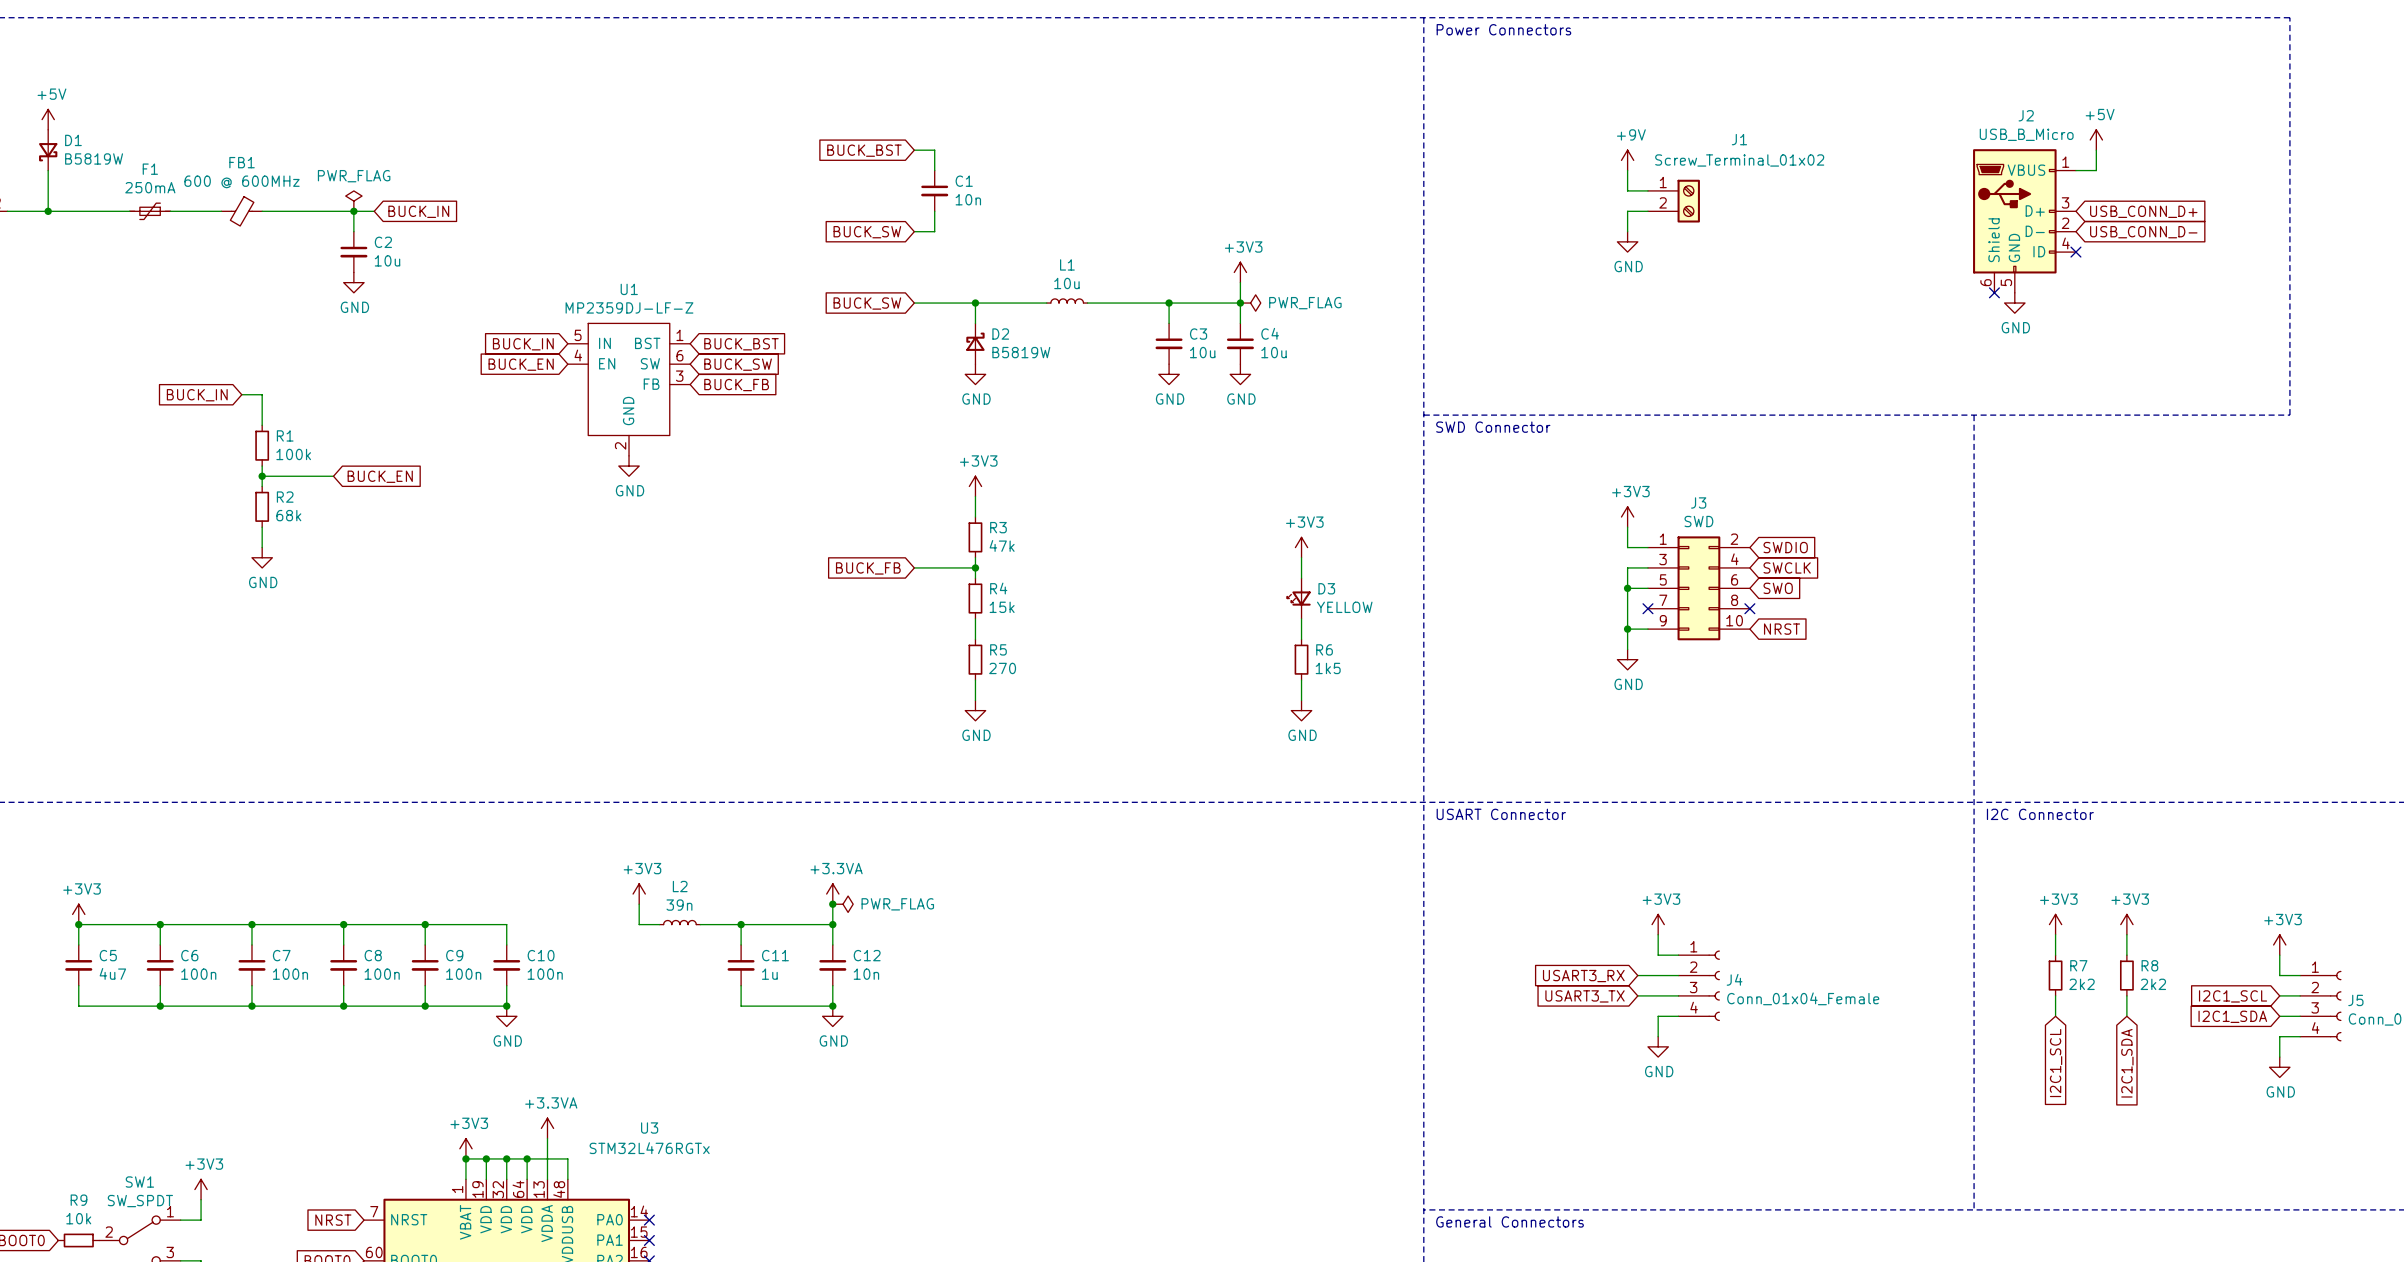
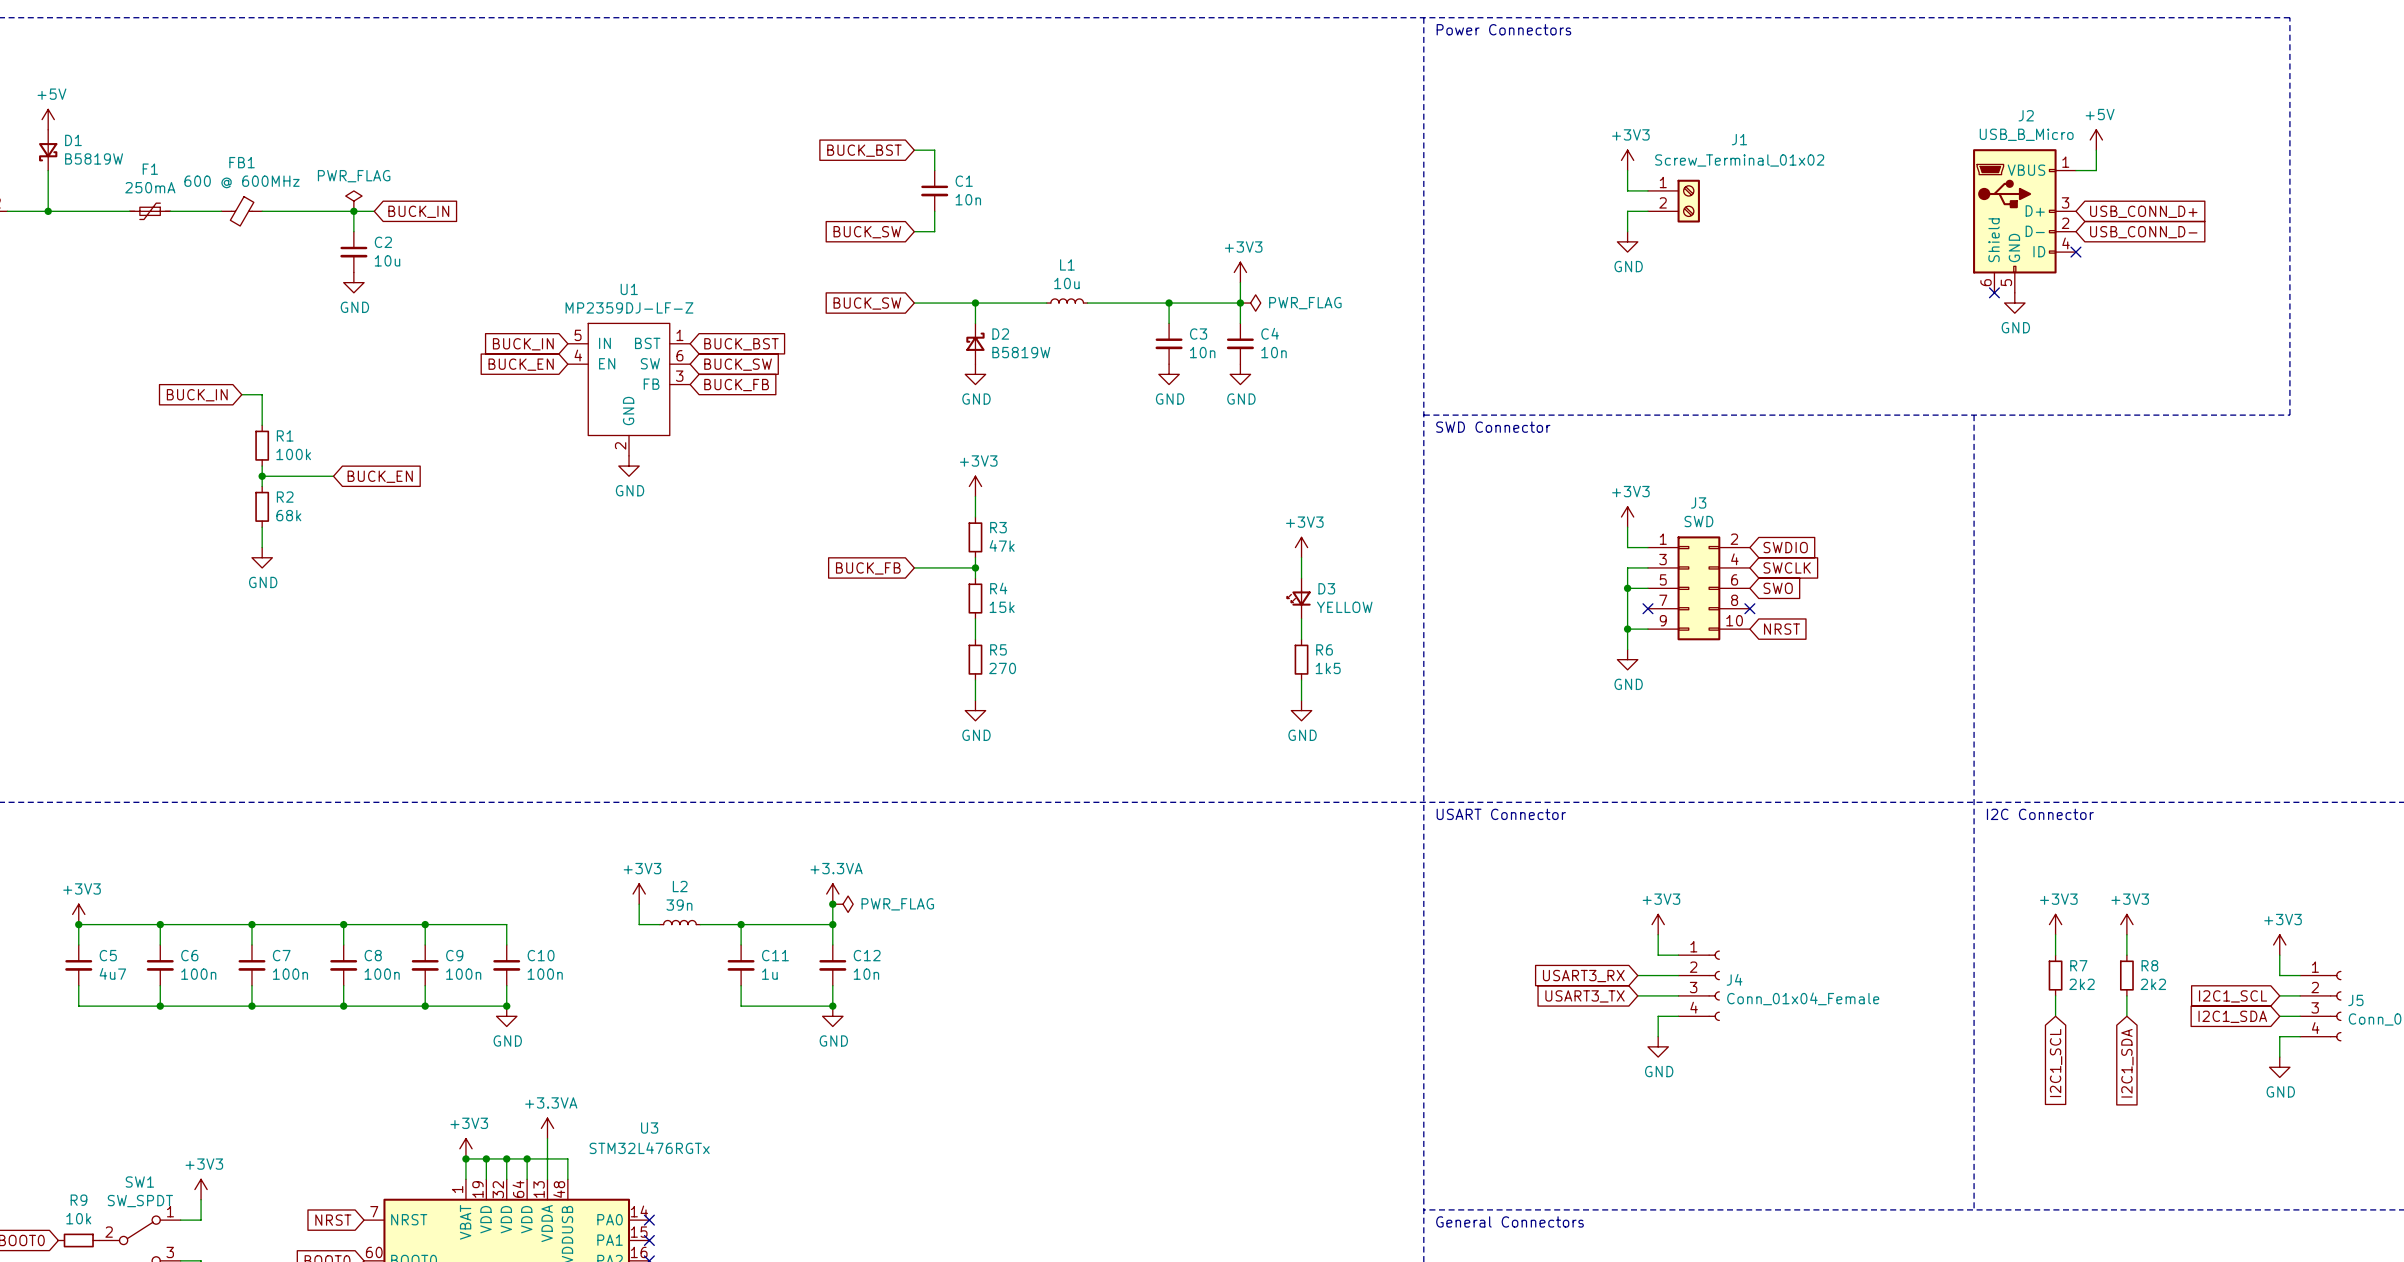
power symbol: +9V (1627, 160) -> +3V3 (1627, 160)
C3 value: 10u (1202, 352) -> 10n (1202, 352)
C4 value: 10u (1274, 352) -> 10n (1274, 352)

